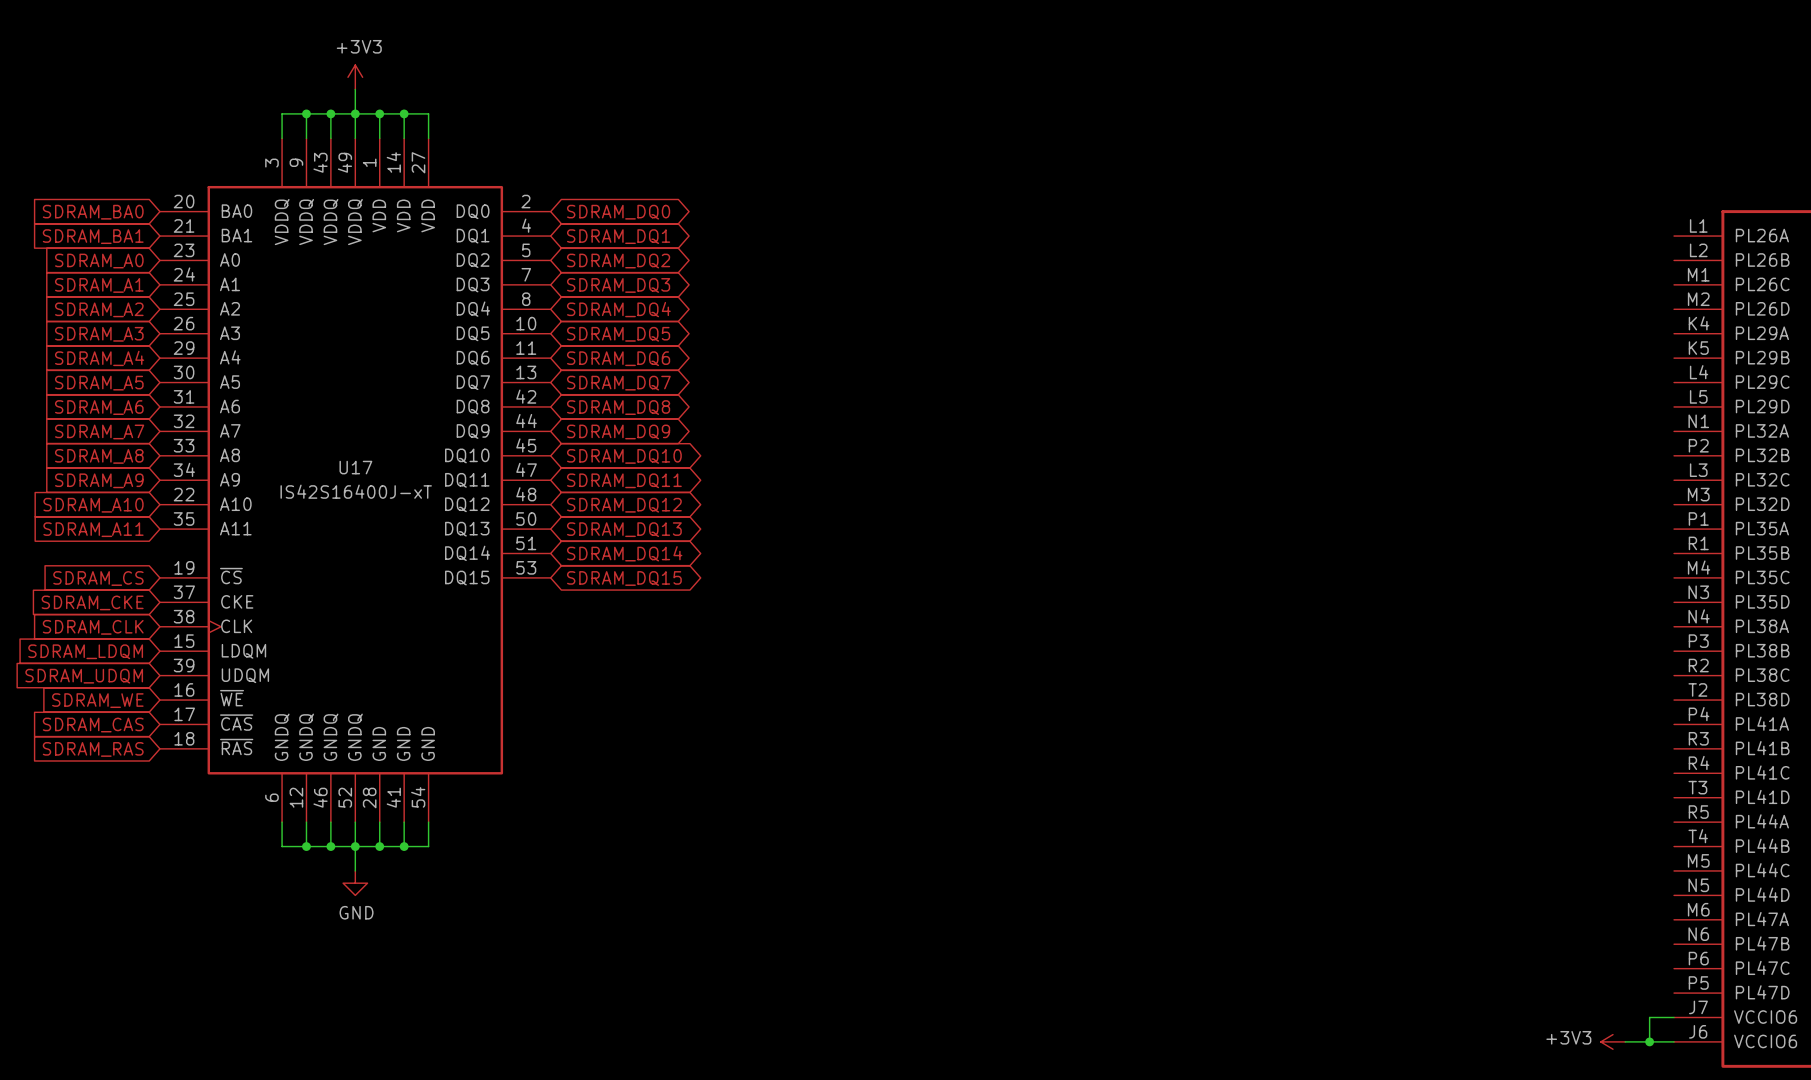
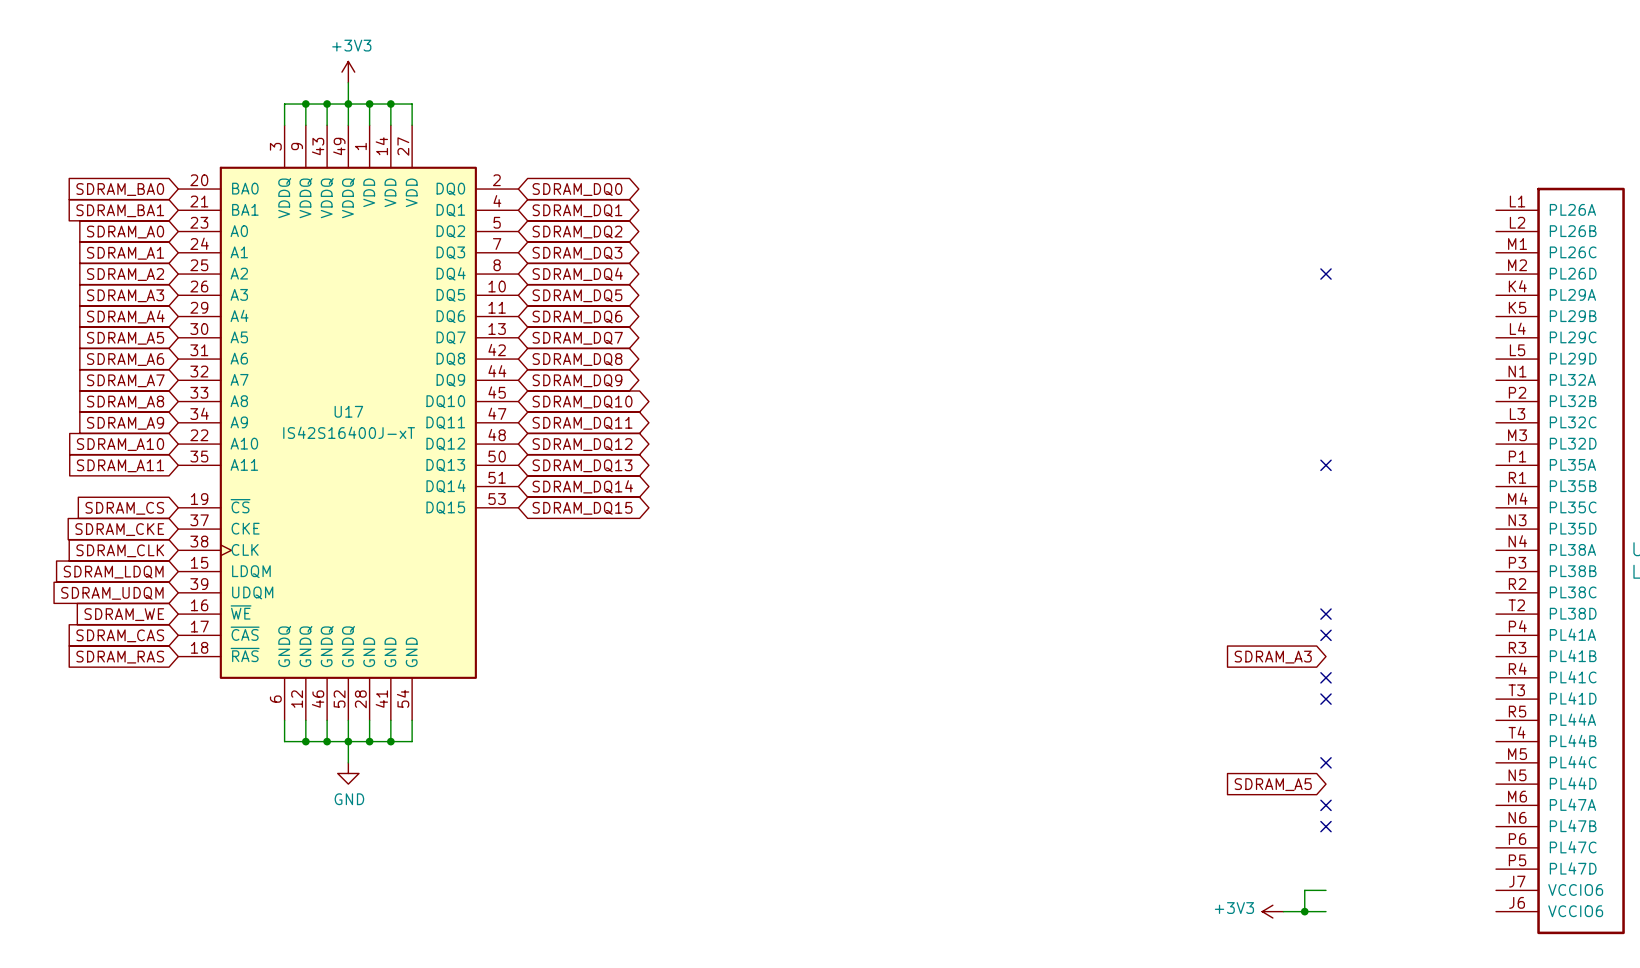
no-connect mark: none -> (1325, 274)
no-connect mark: none -> (1325, 465)
no-connect mark: none -> (1325, 614)
no-connect mark: none -> (1325, 635)
global label: none -> SDRAM_A3 (1273, 657)
no-connect mark: none -> (1325, 677)
no-connect mark: none -> (1325, 699)
no-connect mark: none -> (1325, 762)
global label: none -> SDRAM_A5 (1273, 784)
no-connect mark: none -> (1325, 805)
no-connect mark: none -> (1325, 826)
wire: (1674, 1017) (1649, 1017) (1649, 1041) -> (1325, 890) (1304, 890) (1304, 911)
power symbol: none -> +3V3 (1272, 911)
junction: none -> (1304, 911)
power symbol: +3V3 (1612, 1041) -> none
wire: (1625, 1041) (1674, 1041) -> (1283, 911) (1325, 911)
junction: (1649, 1041) -> none

